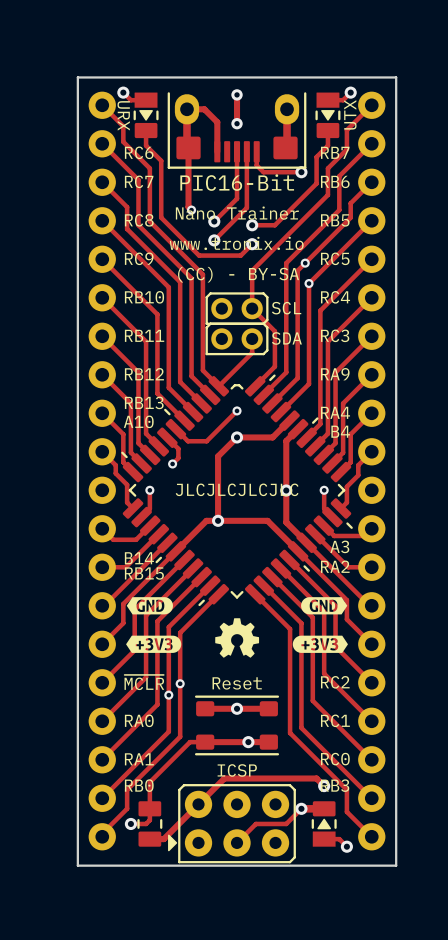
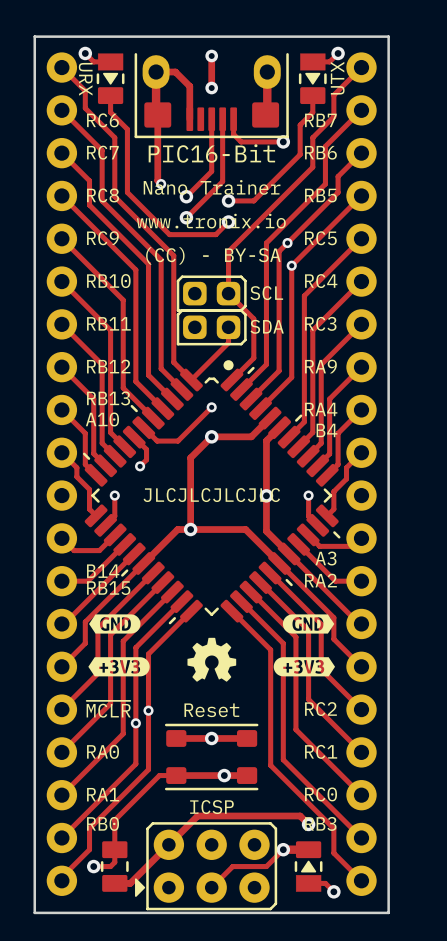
part footprint: [205, 292, 269, 325] -> [176, 275, 247, 312]
part footprint: [205, 322, 269, 356] -> [176, 309, 247, 346]
drawing: none -> [223, 360, 234, 371]

